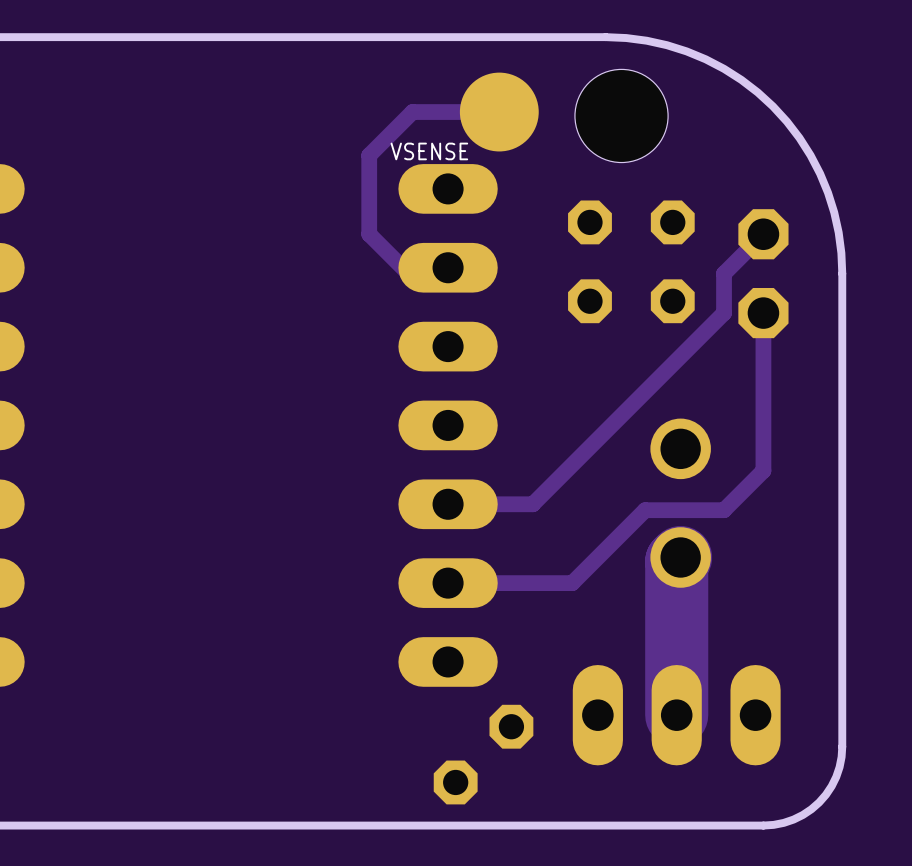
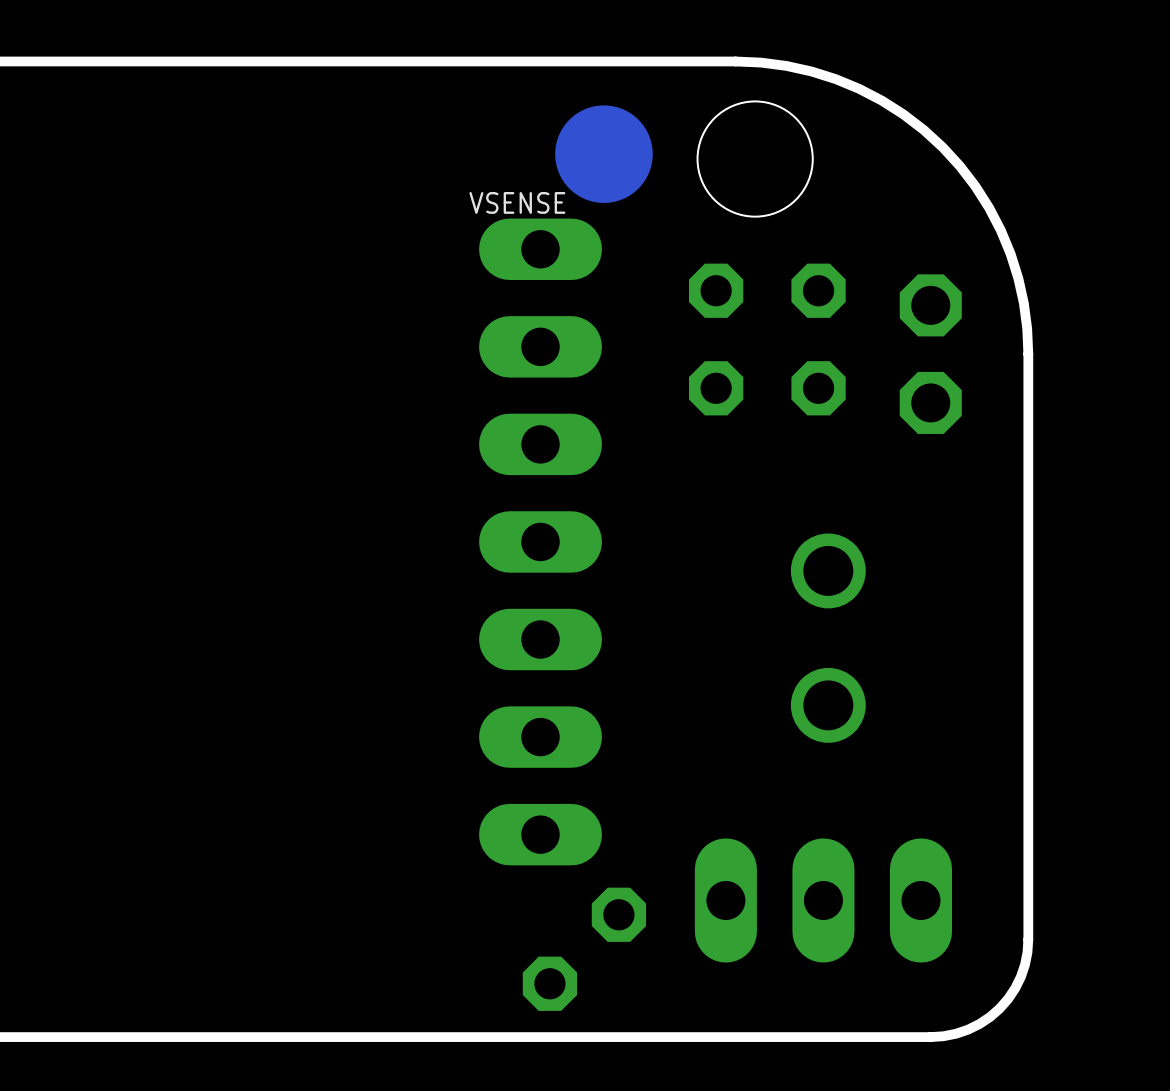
track: (499, 112) (412, 112) (369, 155) (369, 234) (408, 273) (442, 273) (448, 267) -> none
track: (763, 234) (724, 273) (724, 313) (532, 504) (448, 504) -> none
track: (763, 313) (763, 470) (724, 510) (645, 510) (572, 583) (448, 583) -> none
track: (680, 557) (676, 561) (676, 715) -> none

